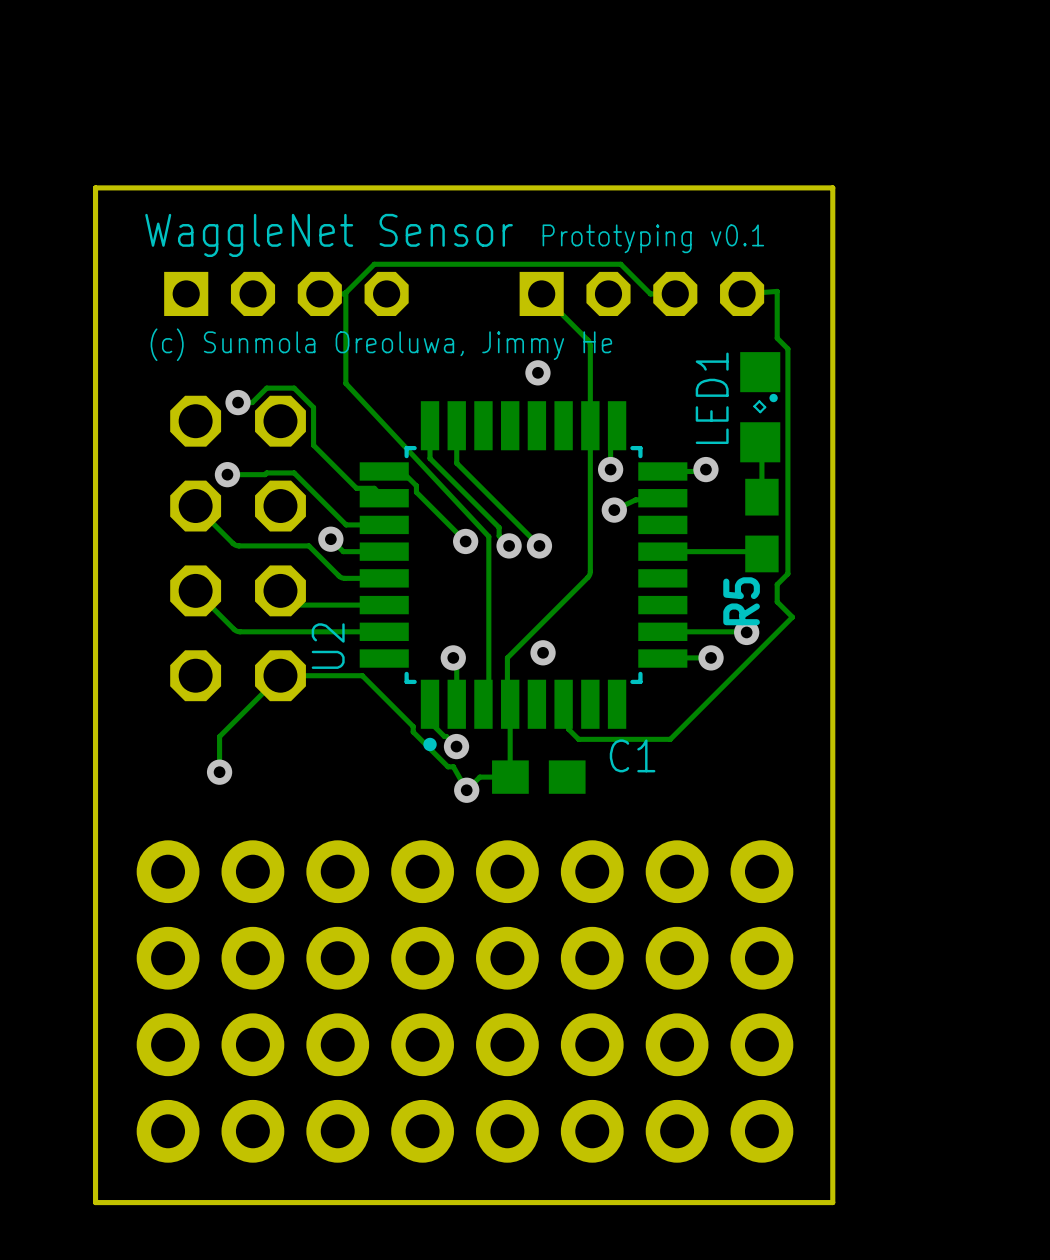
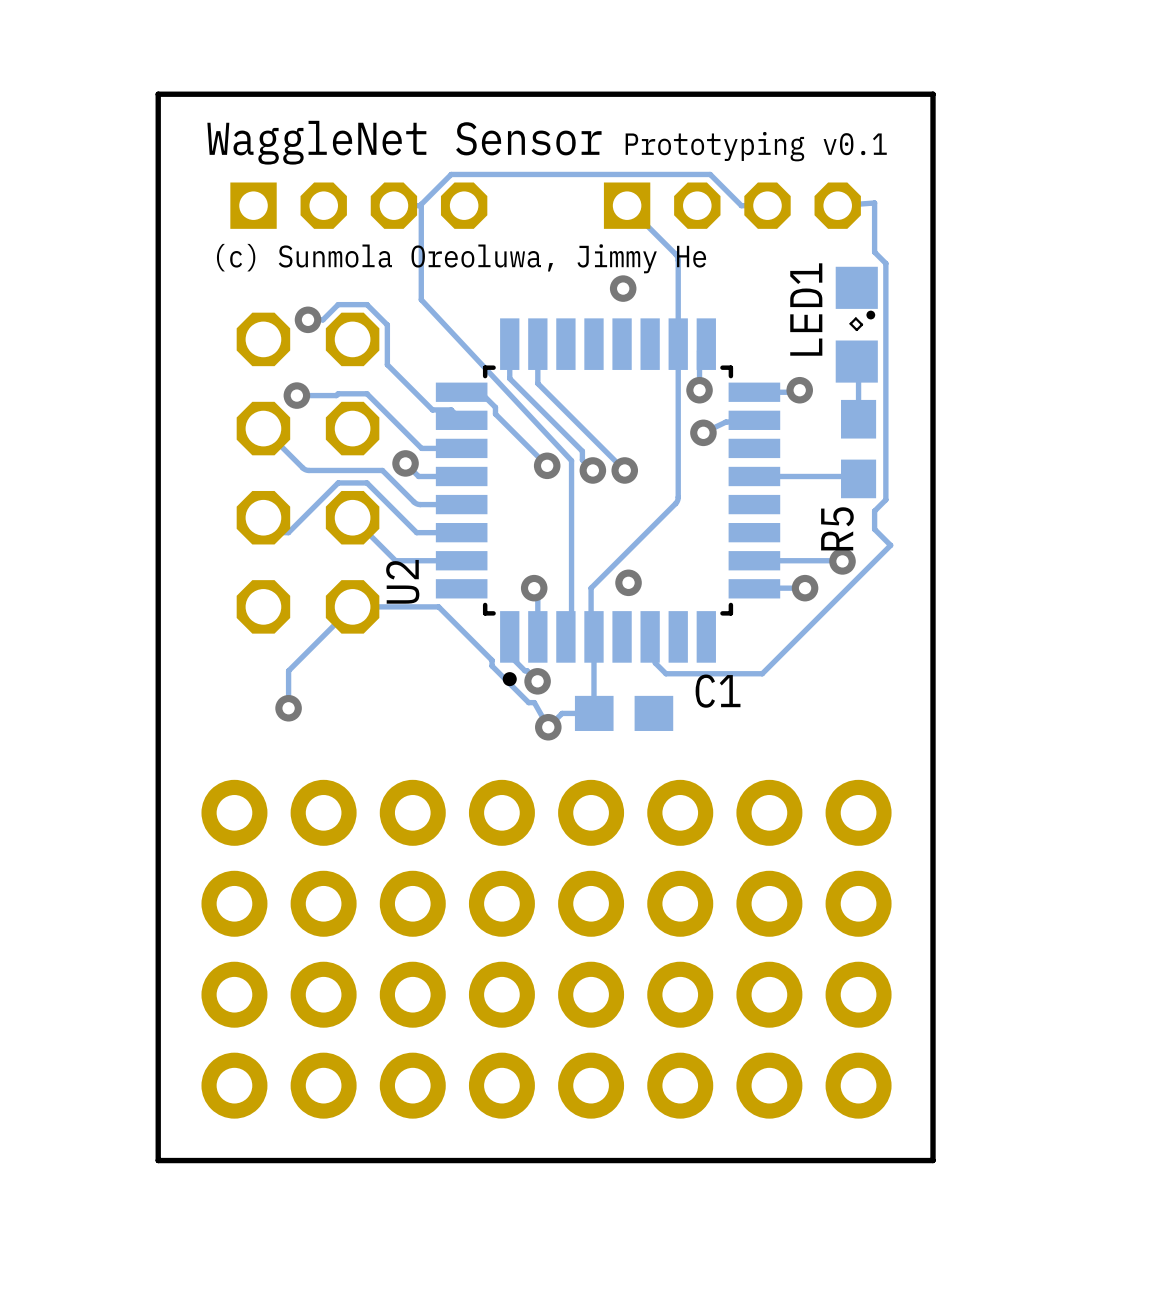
track: (292, 602) (298, 605) (341, 605) -> (364, 530) (395, 560)
track: (209, 605) (237, 631) (321, 631) -> (278, 532) (288, 532) (338, 482) (366, 482) (416, 532)

